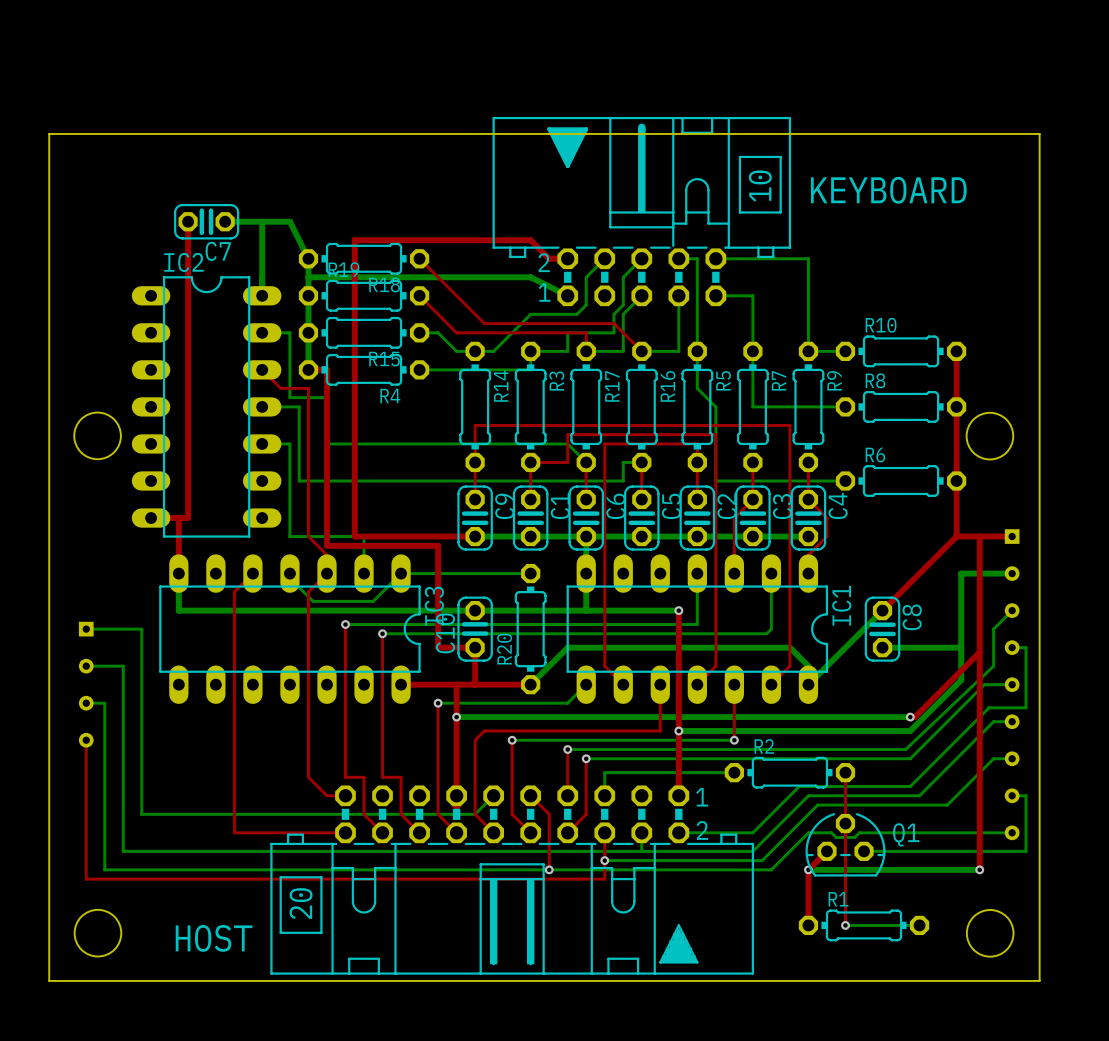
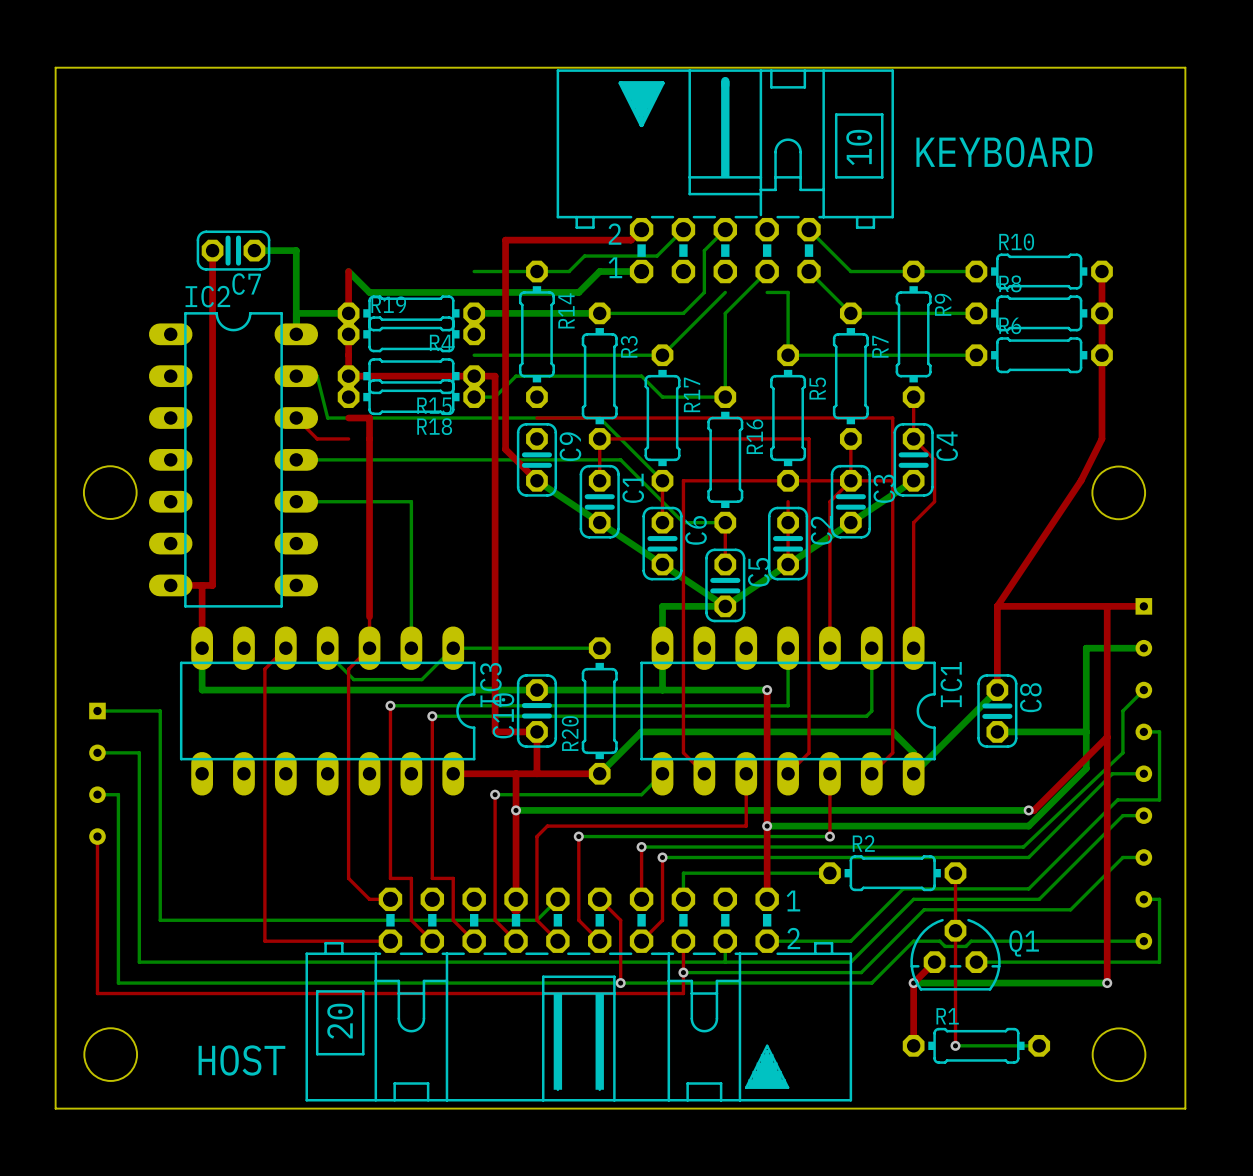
board edge: (49, 133) (1039, 133) (1039, 980) -> (55, 151) (55, 67) (1185, 67) (1185, 1108) (1174, 1108)
top track: none -> (641, 229) (631, 240) (505, 240) (505, 449) (536, 480)
bottom track: none -> (683, 229) (657, 256) (584, 256) (569, 271) (474, 271)
bottom track: none -> (809, 229) (850, 271) (976, 271)
KEYBOARD position: (641, 211) -> (725, 176)
bottom track: (262, 221) (289, 221) (308, 258) (308, 369) -> none
bottom track: none -> (348, 271) (369, 292) (578, 292) (599, 271) (641, 271)
top track: none -> (348, 271) (348, 397)
bottom track: none -> (809, 271) (850, 313) (976, 313)
top track: none -> (1101, 271) (1101, 438) (1081, 480) (997, 606)
R18 position: (364, 258) -> (411, 397)
top track: (419, 258) (484, 323) (614, 323) (641, 351) -> none
top track: (567, 258) (549, 258) (530, 240) (354, 240) (354, 536) (475, 536) -> none
bottom track: (604, 258) (586, 277) (586, 305) (576, 314) -> (704, 313) (662, 355) (652, 355)
bottom track: (715, 258) (808, 258) (808, 351) (845, 351) -> none
bottom track: (308, 277) (419, 277) -> (348, 313) (296, 313)
bottom track: (530, 277) (567, 295) -> (599, 313) (683, 313) (704, 292) (704, 250) (725, 229)
bottom track: (623, 277) (623, 305) (614, 314) (614, 332) (567, 332) (567, 351) (530, 351) (530, 369) -> (662, 480) (599, 418)
top track: (419, 295) (456, 332) (586, 332) (586, 351) -> none
bottom track: (641, 295) (623, 314) (623, 351) -> (767, 271) (725, 313) (725, 397) (704, 397)
bottom track: (678, 295) (678, 351) (641, 351) -> none
bottom track: (715, 295) (752, 295) (752, 406) (845, 406) -> none
bottom track: (530, 314) (493, 351) (456, 351) (438, 332) (419, 332) -> (599, 355) (474, 355)
bottom track: (697, 314) (697, 388) (715, 406) (715, 480) (845, 480) -> (788, 355) (976, 355)
bottom track: (280, 332) (289, 332) (289, 397) (326, 397) (326, 443) -> (327, 501) (369, 501)
bottom track: none -> (317, 376) (327, 418) (474, 418)
top track: none -> (348, 376) (495, 376) (495, 616)
bottom track: none -> (474, 397) (495, 397) (516, 376) (641, 376) (662, 397)
top track: none -> (913, 397) (913, 438) (934, 459) (934, 501) (913, 522)
R10 position: (901, 351) -> (1039, 271)
top track: (956, 351) (956, 536) (882, 610) -> (997, 606) (997, 690)
R4 position: (364, 369) -> (411, 313)
top track: none -> (536, 418) (892, 418) (892, 480)
top track: (308, 388) (308, 536) (326, 555) -> none
bottom track: (299, 406) (299, 480) (623, 480) (623, 462) -> (338, 459) (620, 459) (683, 522) (704, 522)
R14 position: (475, 406) -> (536, 334)
R3 position: (530, 406) -> (599, 376)
R17 position: (586, 406) -> (662, 418)
R5 position: (697, 406) -> (788, 418)
R7 position: (752, 406) -> (850, 376)
R9 position: (808, 406) -> (913, 334)
R8 position: (901, 406) -> (1039, 313)
bottom track: none -> (536, 480) (725, 606) (913, 480)
top track: (604, 425) (475, 425) (475, 499) -> none
top track: (715, 434) (567, 434) (567, 462) (530, 462) (530, 499) -> (809, 491) (809, 438) (599, 438) (599, 480)
bottom track: (289, 443) (289, 536) (364, 536) -> (411, 501) (411, 606)
bottom track: (364, 443) (567, 443) (586, 462) -> none
top track: (604, 443) (697, 443) -> (683, 501) (683, 480)
top track: (586, 462) (586, 499) -> (662, 522) (662, 480)
top track: (752, 462) (752, 499) (734, 518) -> (850, 438) (850, 480) (829, 501) (829, 585)
R6 position: (901, 480) -> (1039, 355)
top track: (808, 499) (826, 518) (826, 536) (808, 555) -> (913, 564) (913, 627)
C9 position: (475, 518) -> (536, 459)
C1 position: (530, 518) -> (599, 501)
C6 position: (586, 518) -> (662, 543)
C2 position: (697, 518) -> (788, 543)
C3 position: (752, 518) -> (850, 501)
C4 position: (808, 518) -> (913, 459)
bottom track: (475, 536) (586, 536) -> none
bottom track: (641, 536) (808, 536) -> none
top track: none -> (997, 606) (1081, 606)
top track: (326, 545) (438, 545) -> (369, 616) (369, 627)

